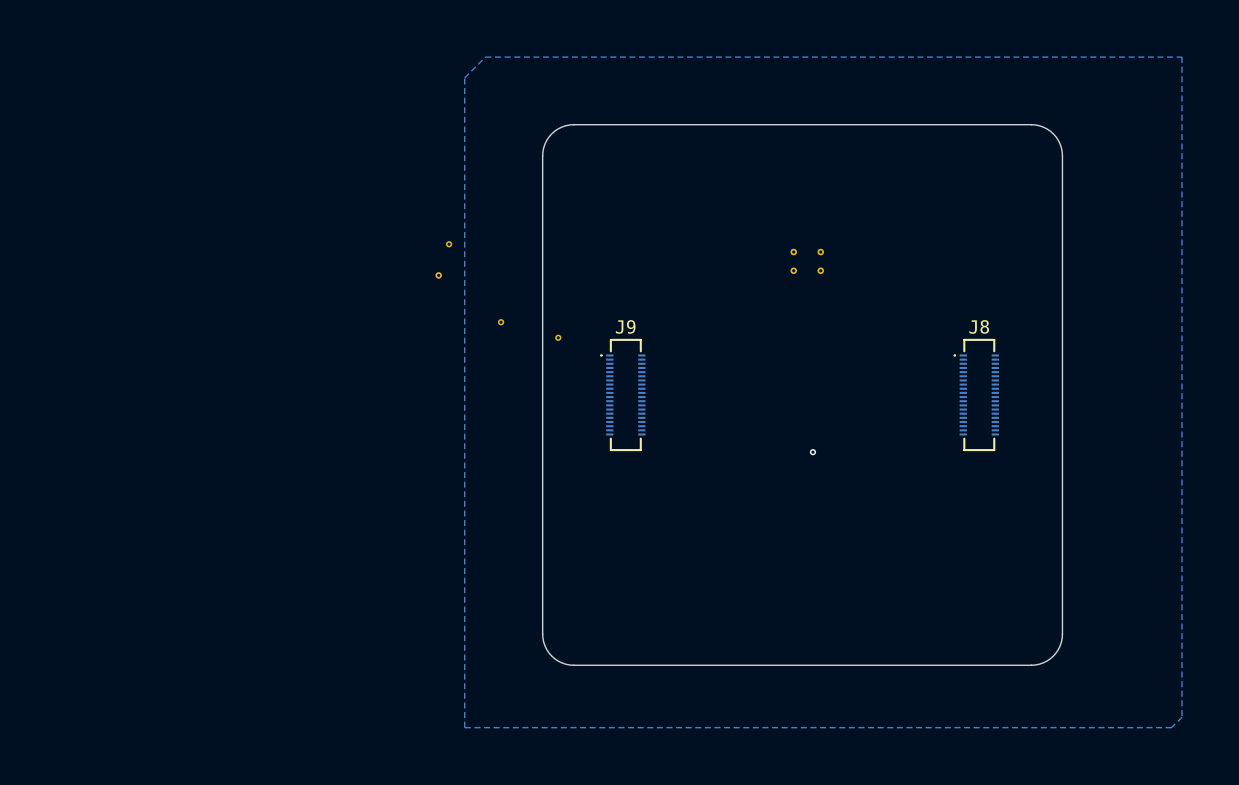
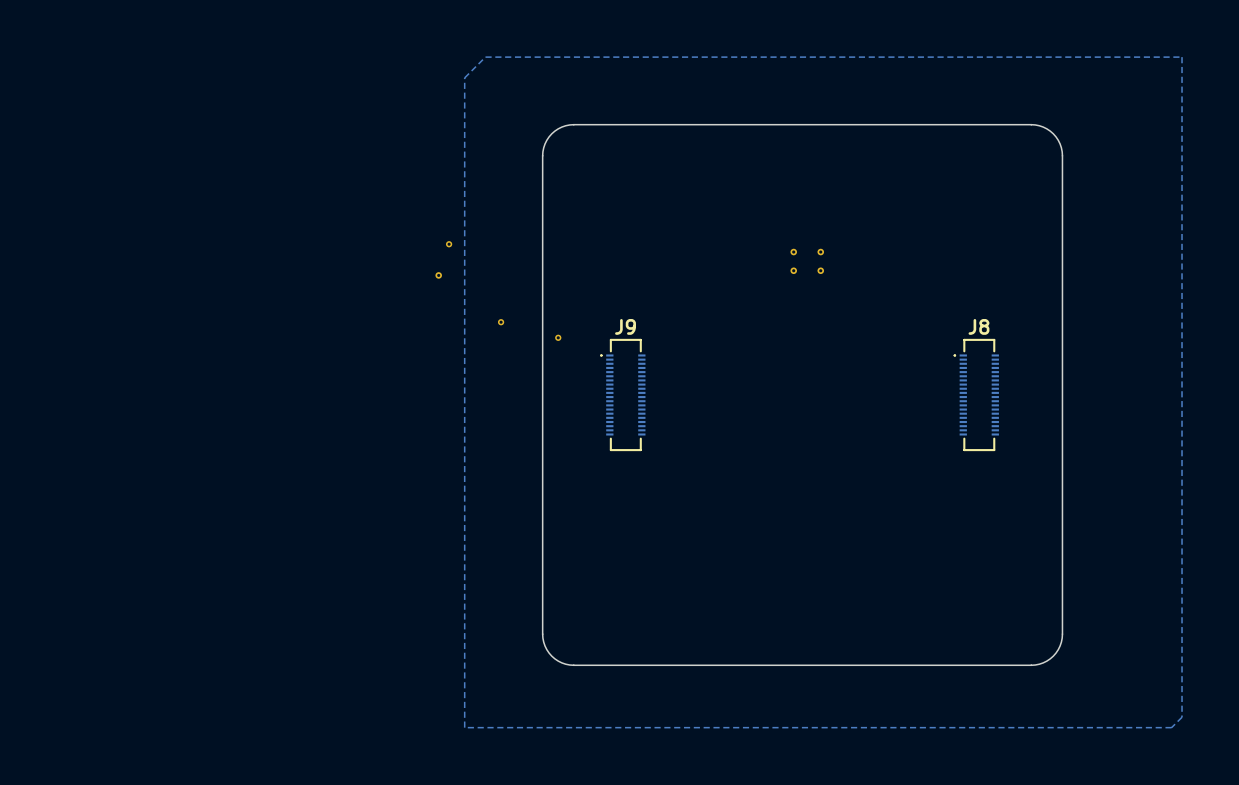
via: (812, 452) -> none

